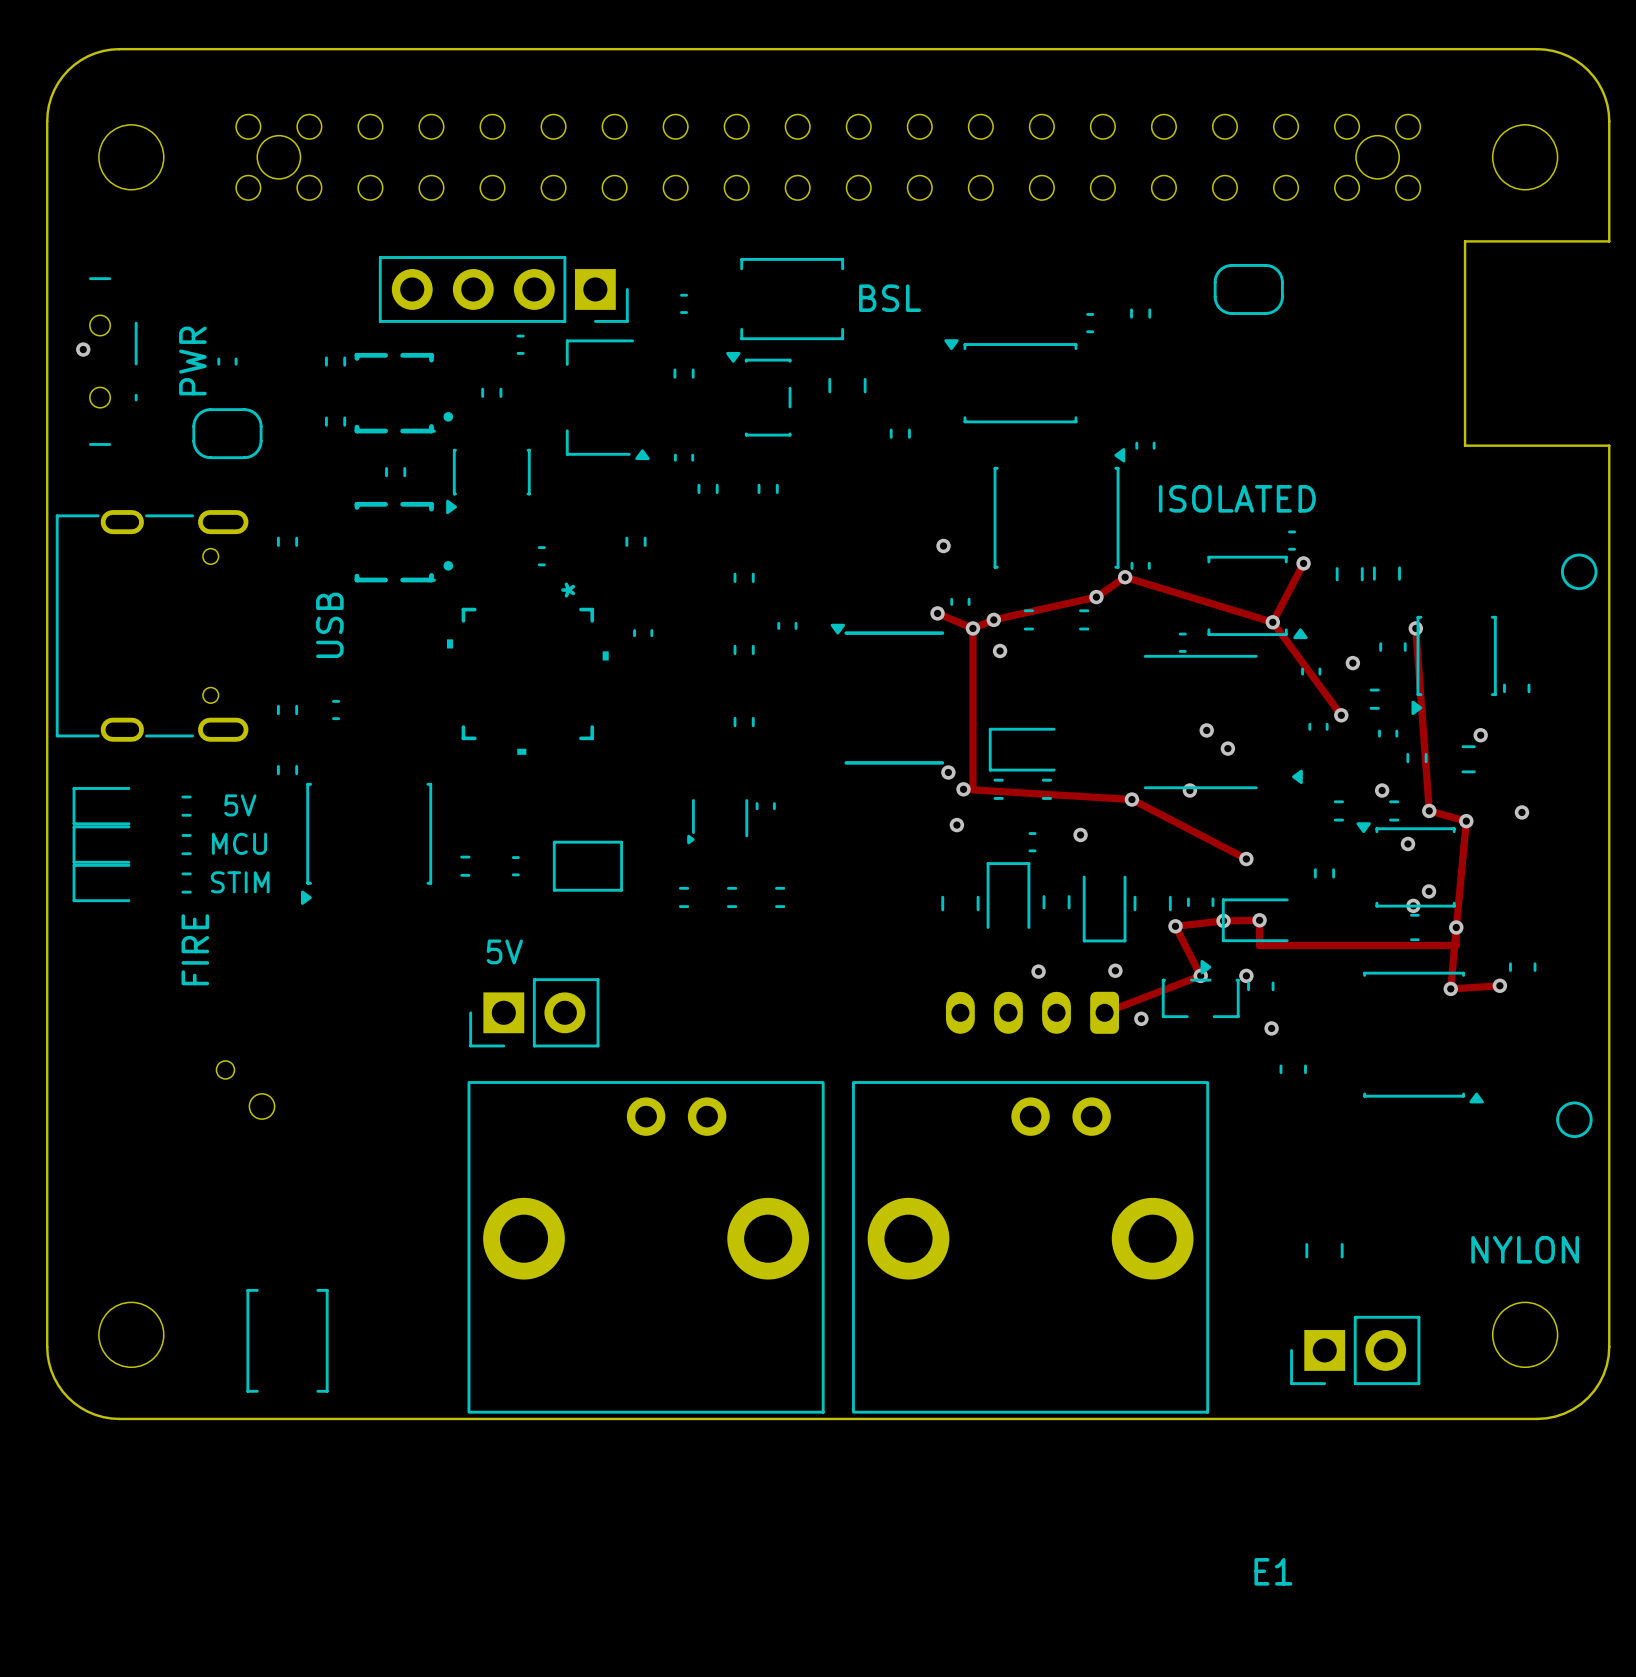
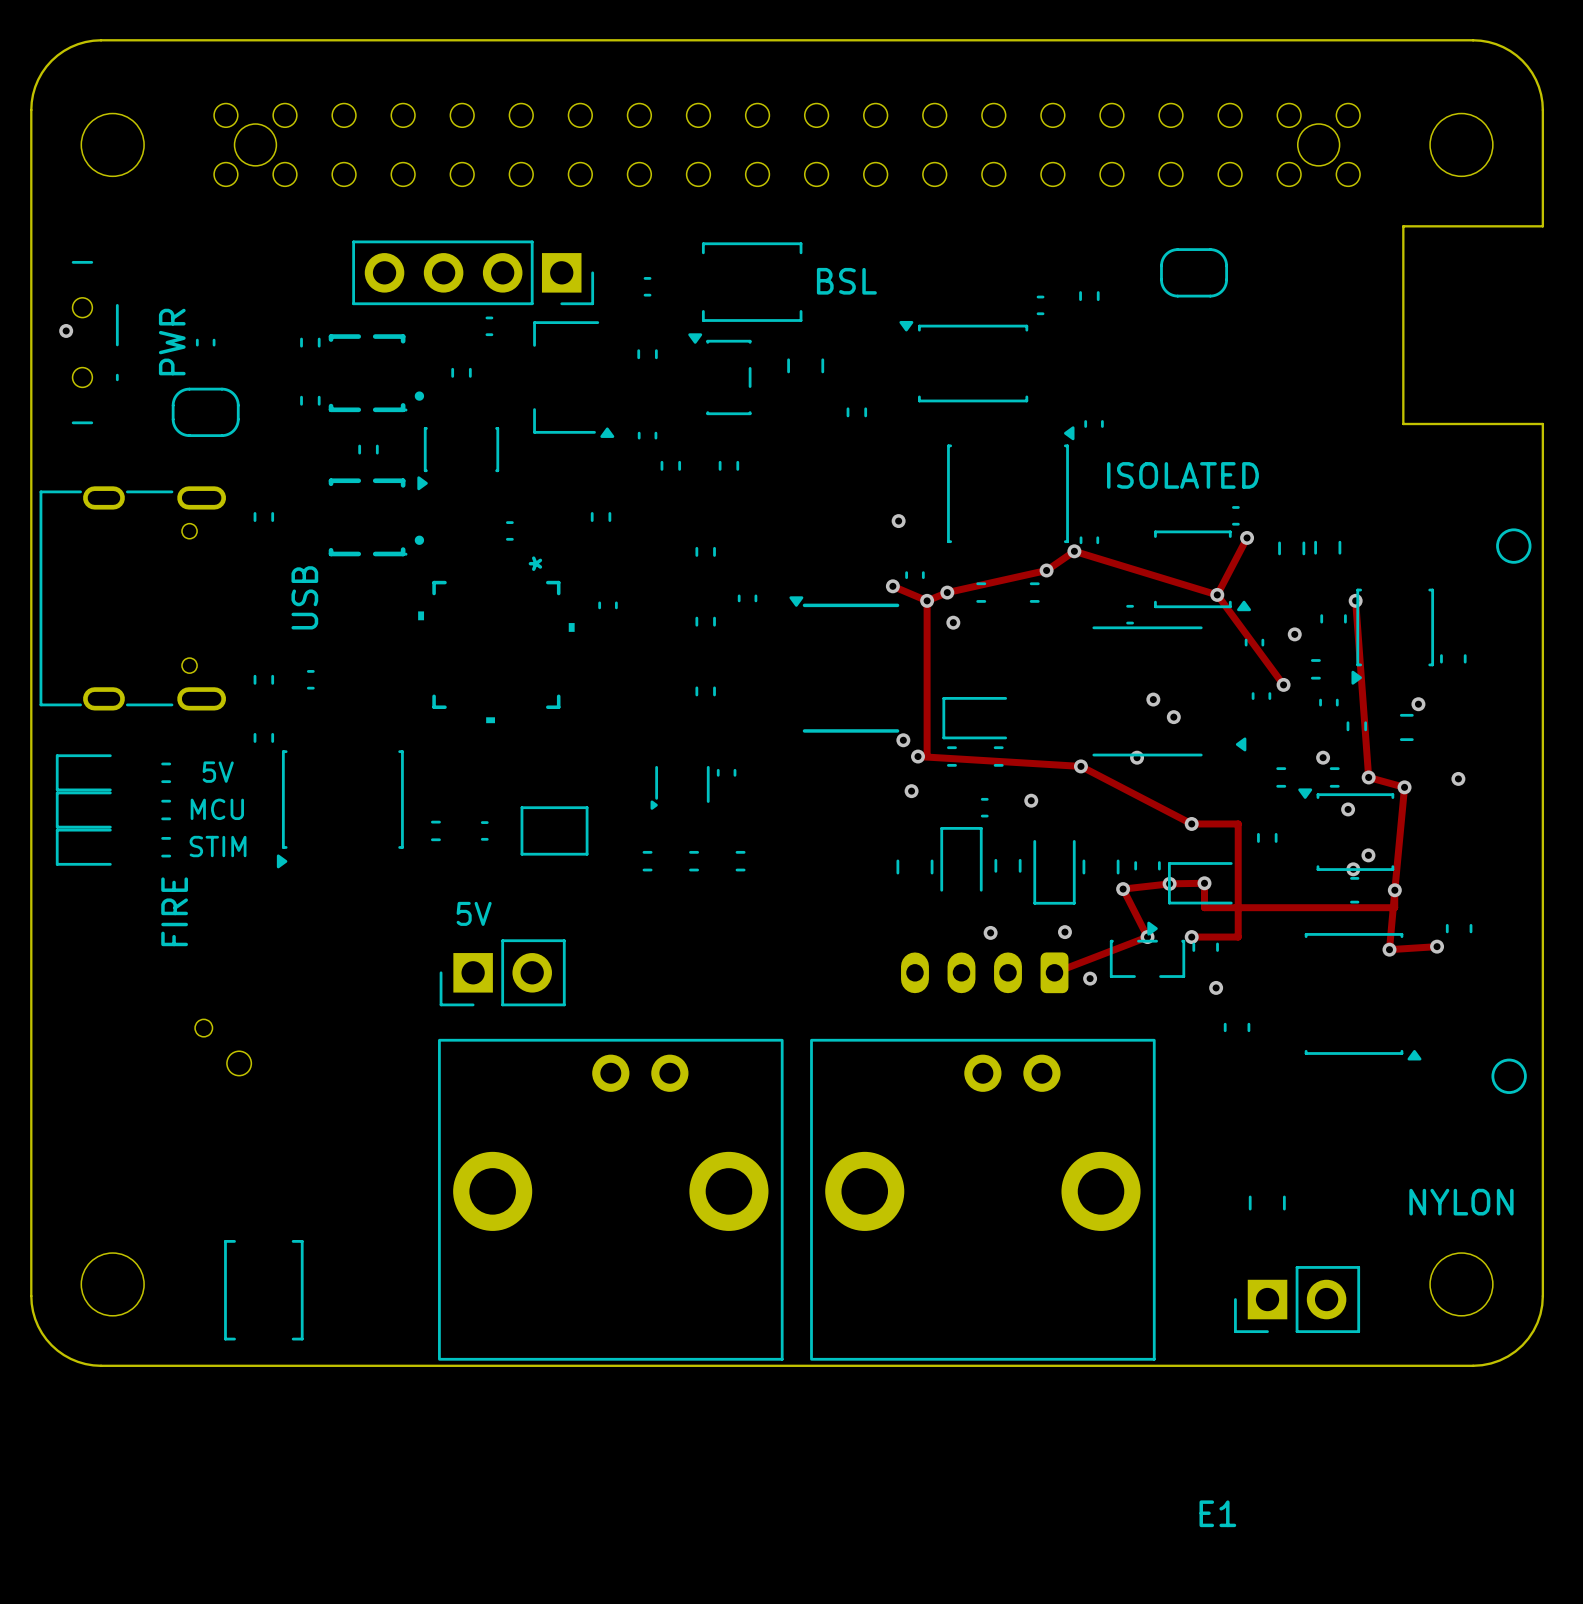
track: none -> (1191, 823) (1238, 823) (1238, 937) (1191, 937)

